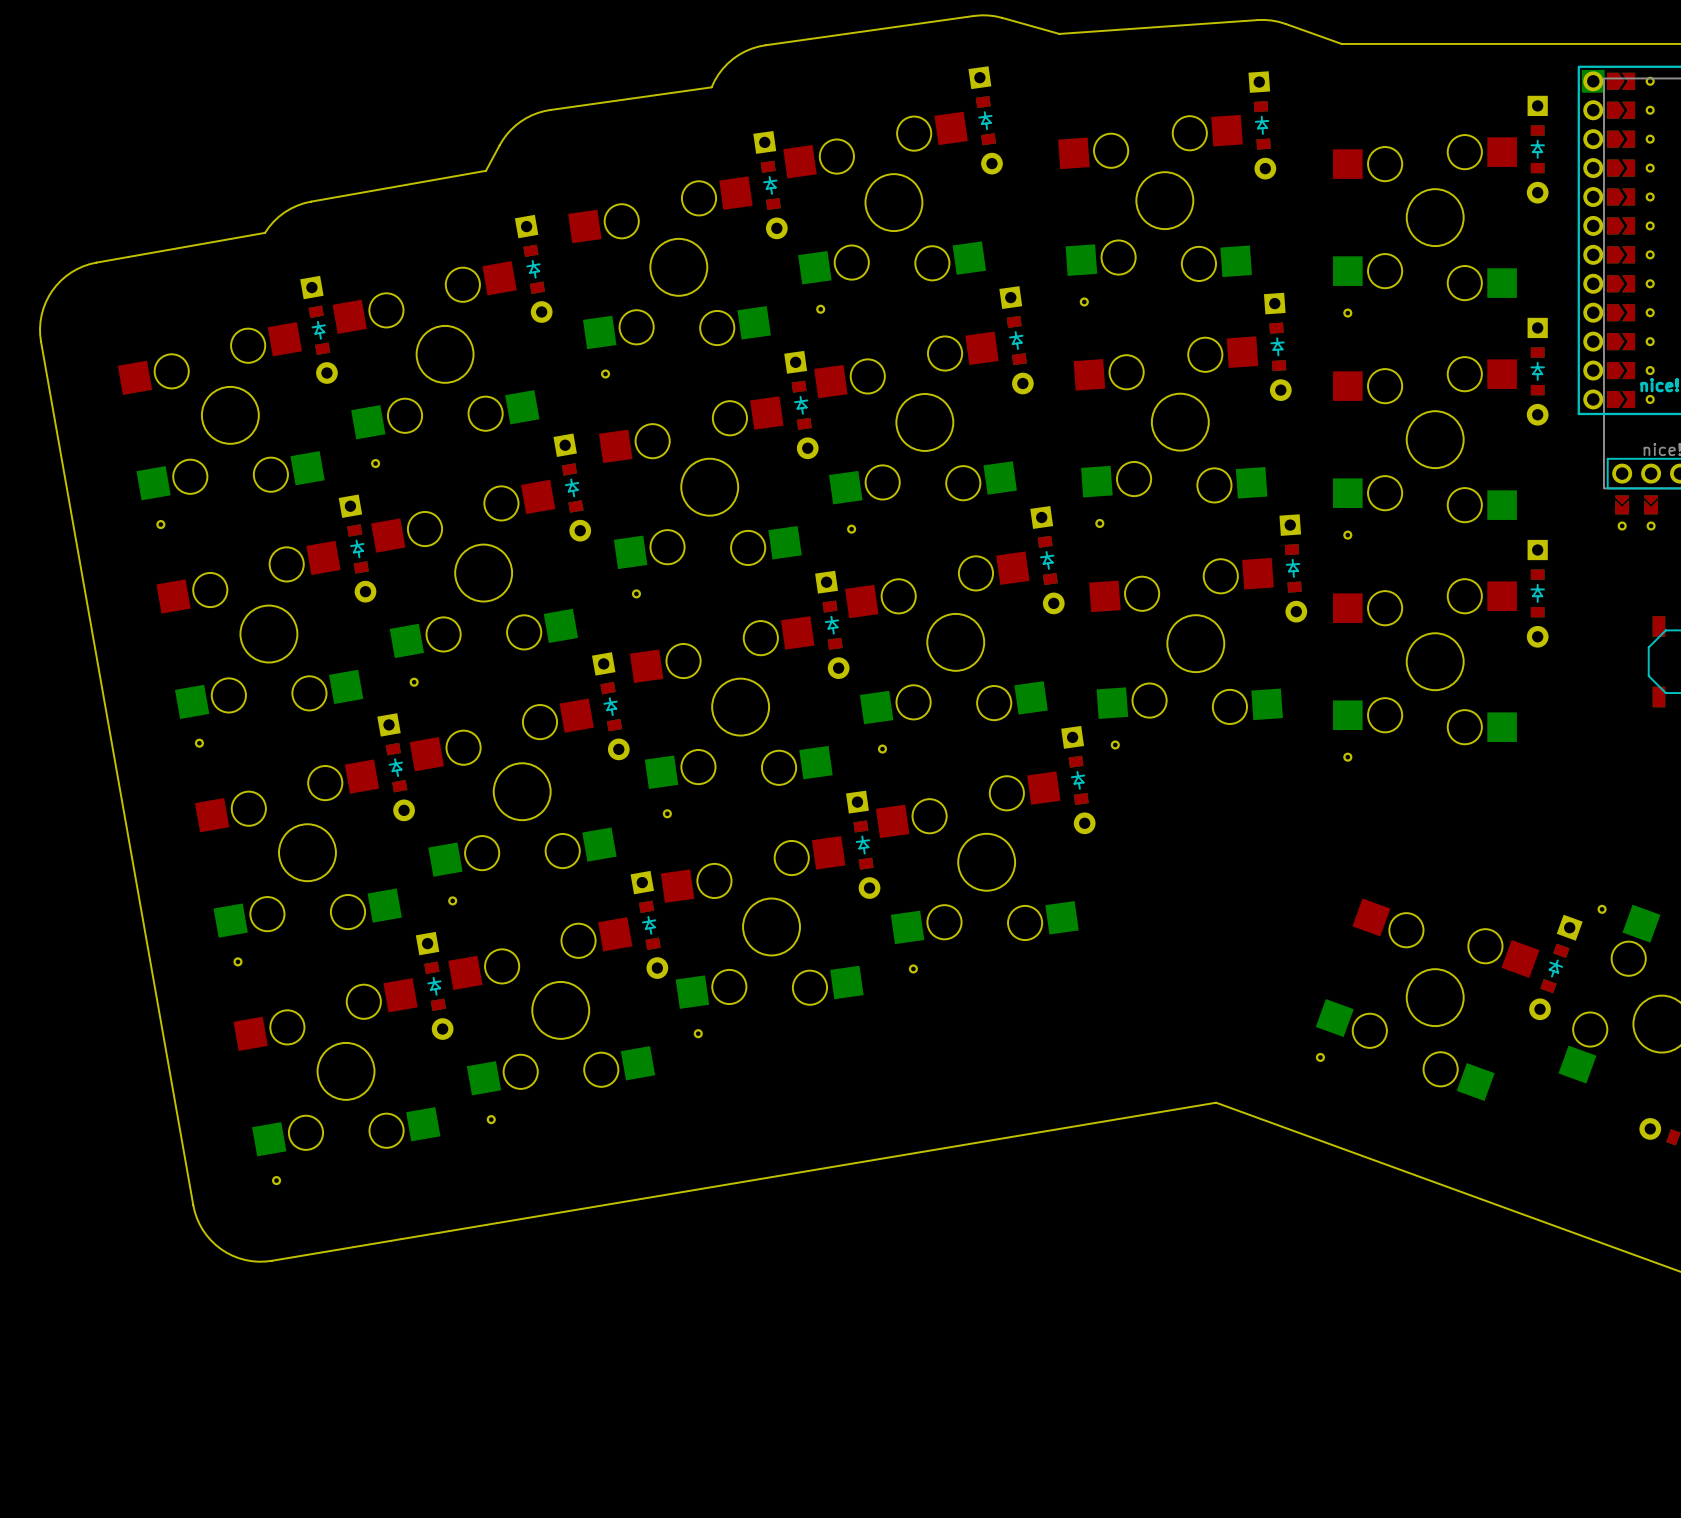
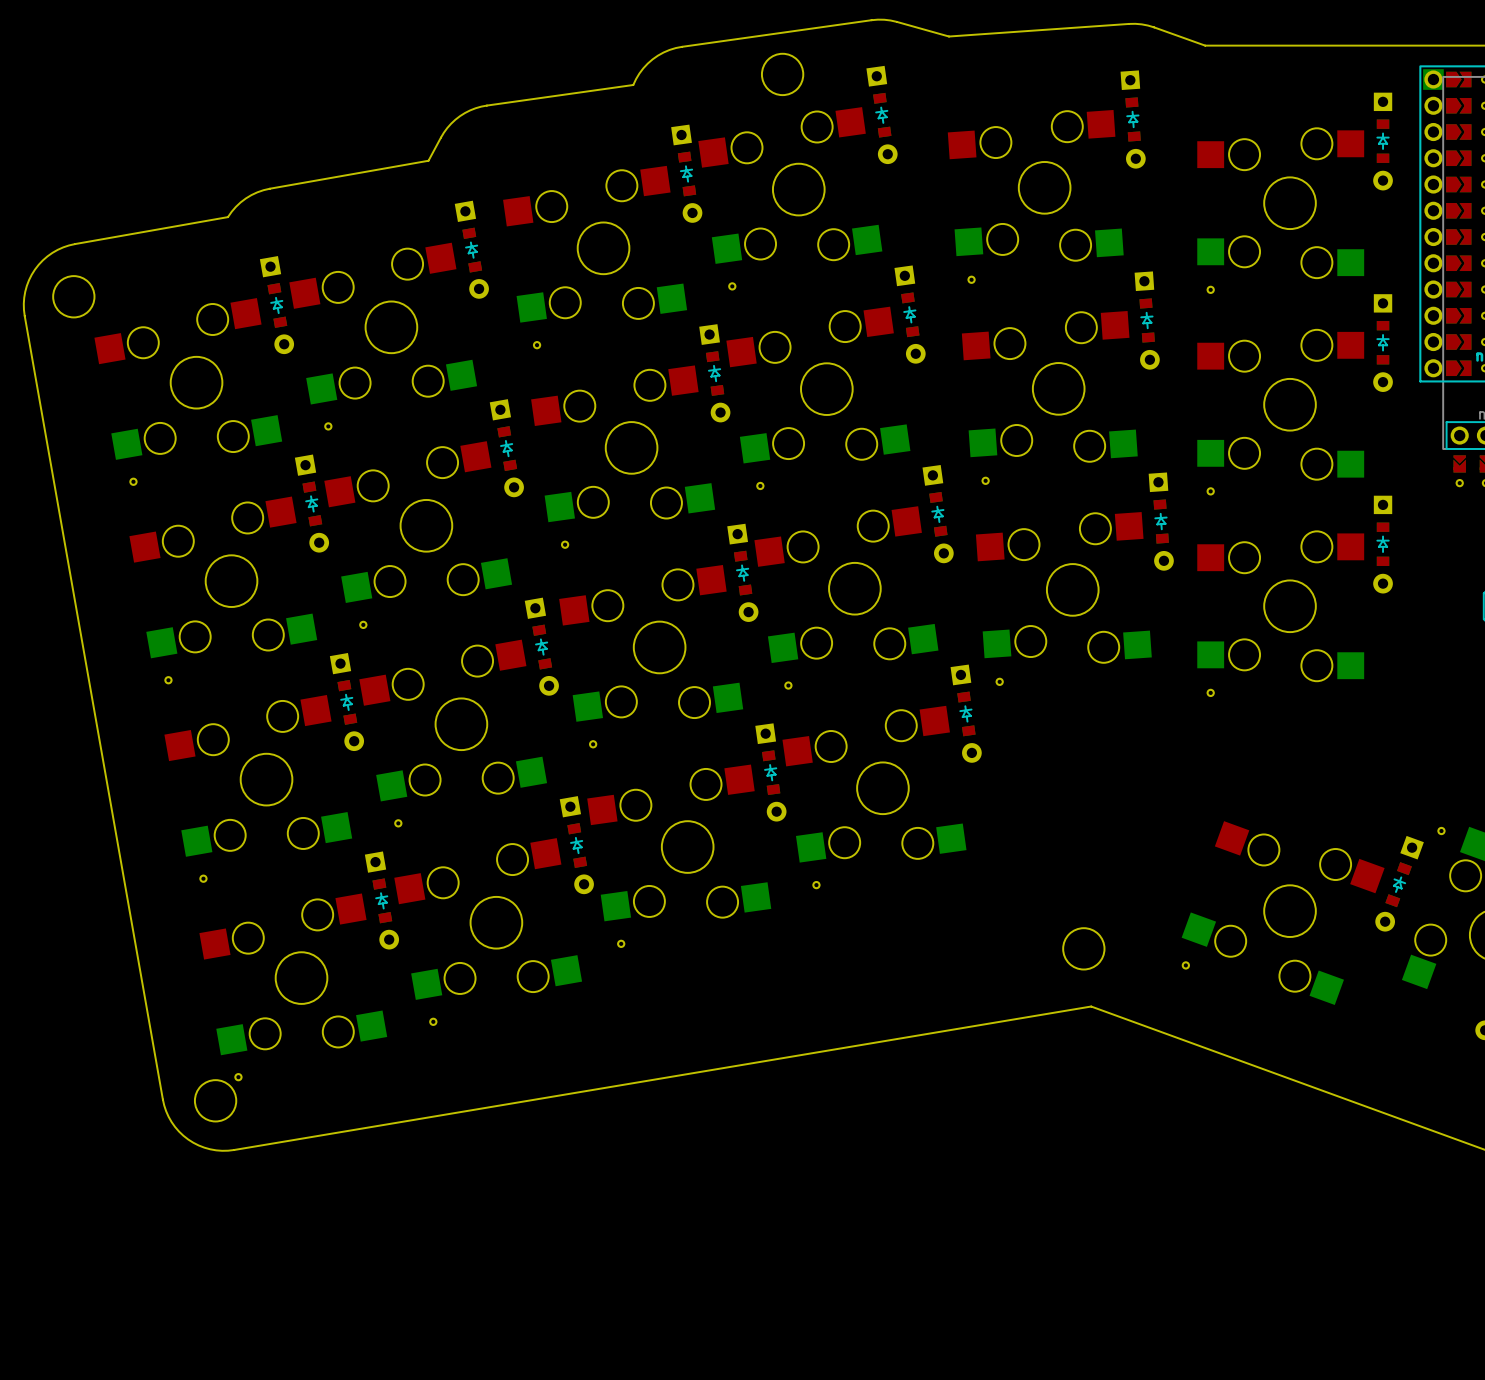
round board edge: none -> [761, 53, 805, 96]
round board edge: none -> [52, 275, 96, 319]
round board edge: none -> [1062, 927, 1106, 971]
round board edge: none -> [194, 1079, 238, 1123]

